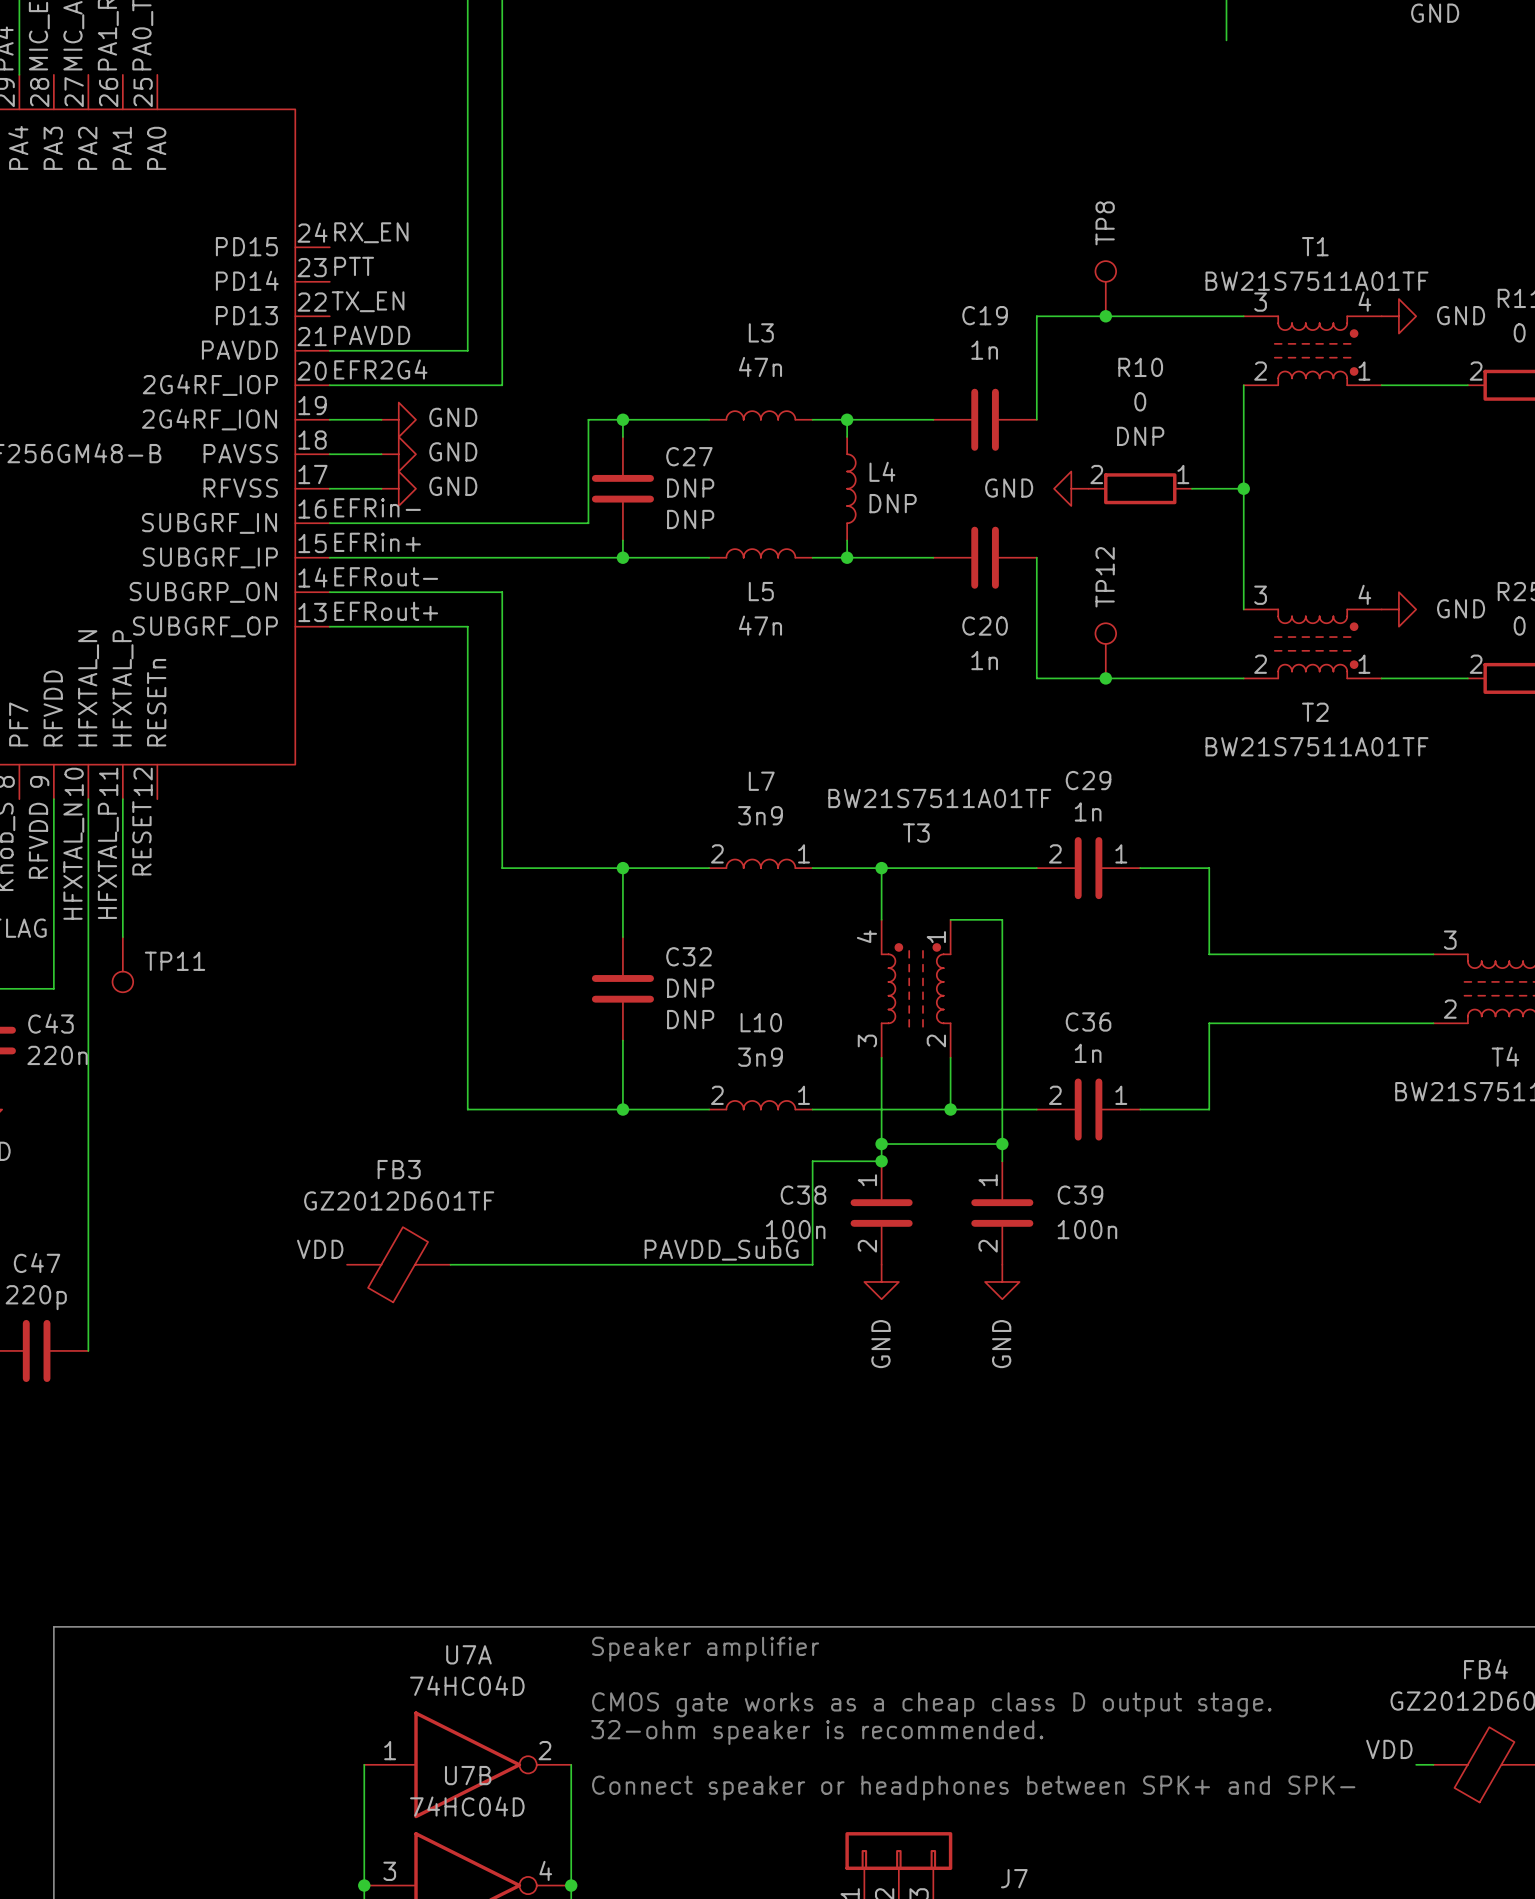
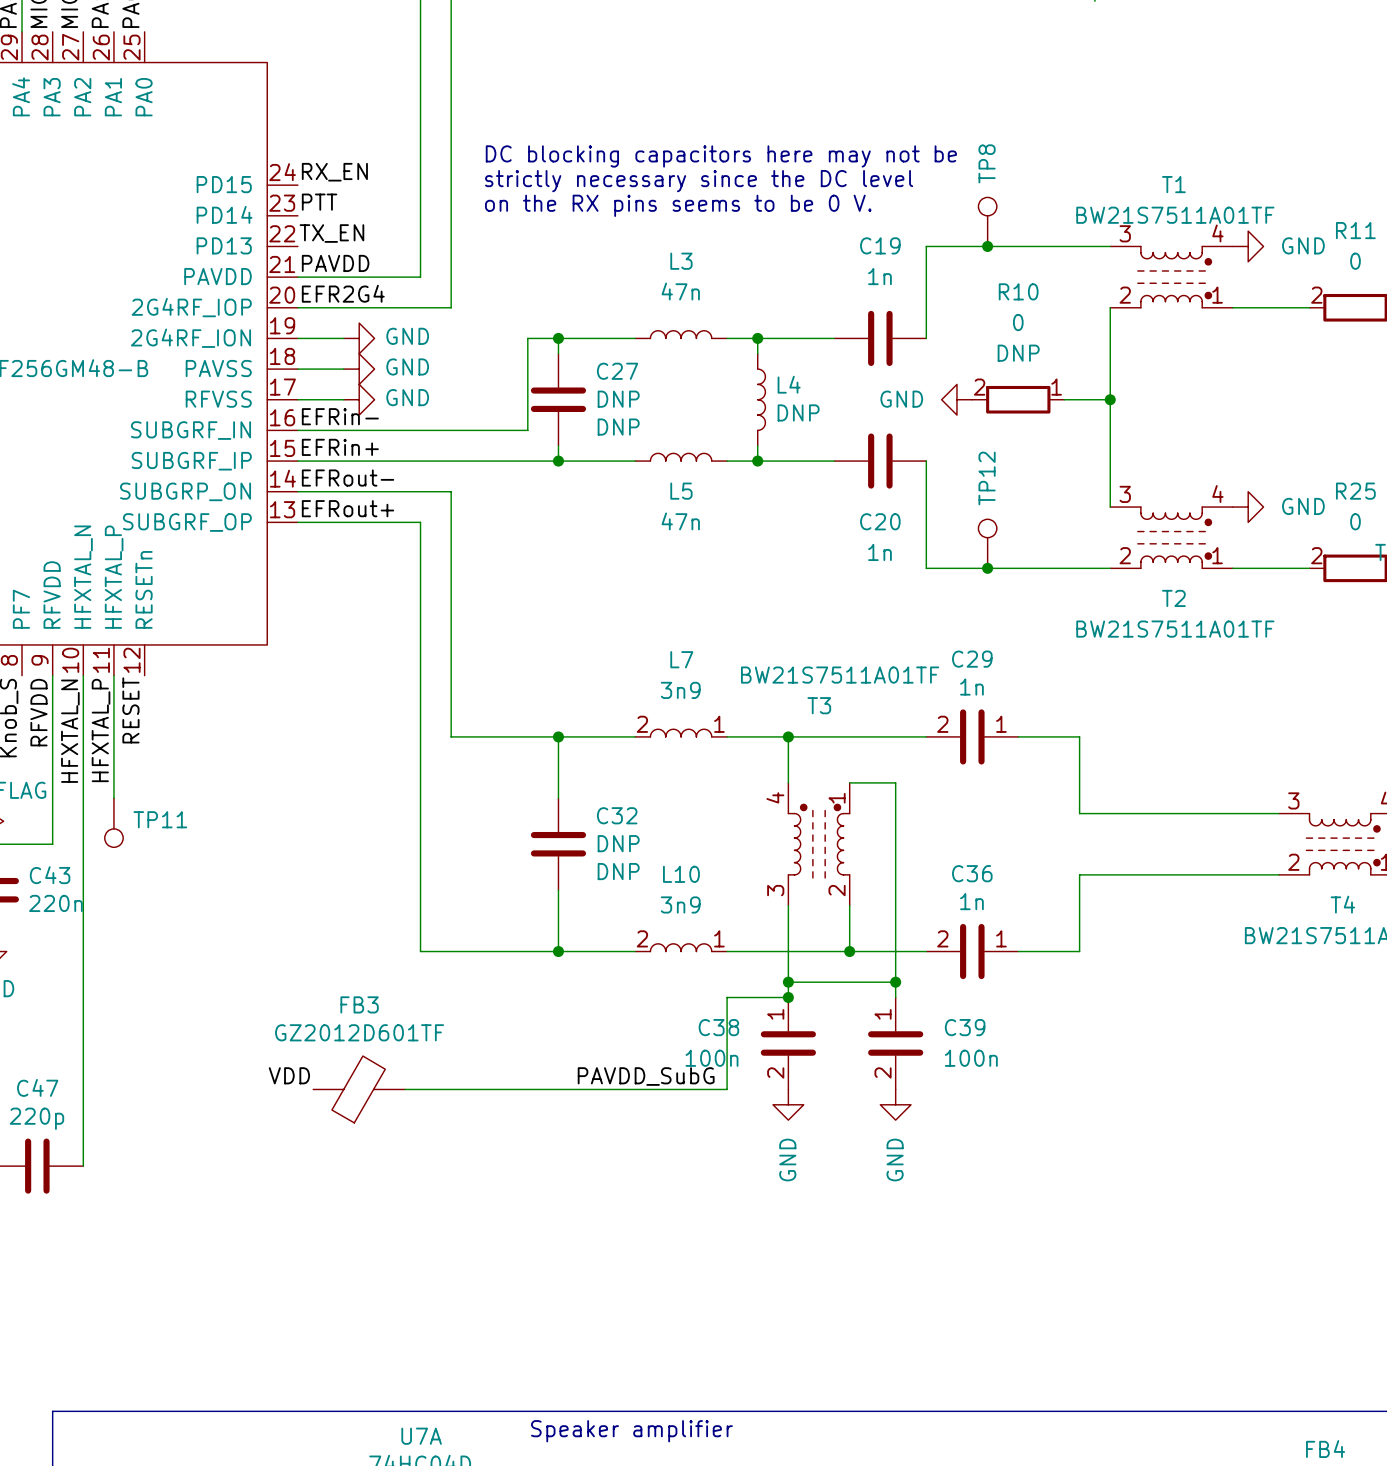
text: none -> DC blocking capacitors here may not be (721, 156)
text: none -> strictly necessary since the DC level (699, 181)
text: none -> on the RX pins seems to be 0 V. (678, 205)

